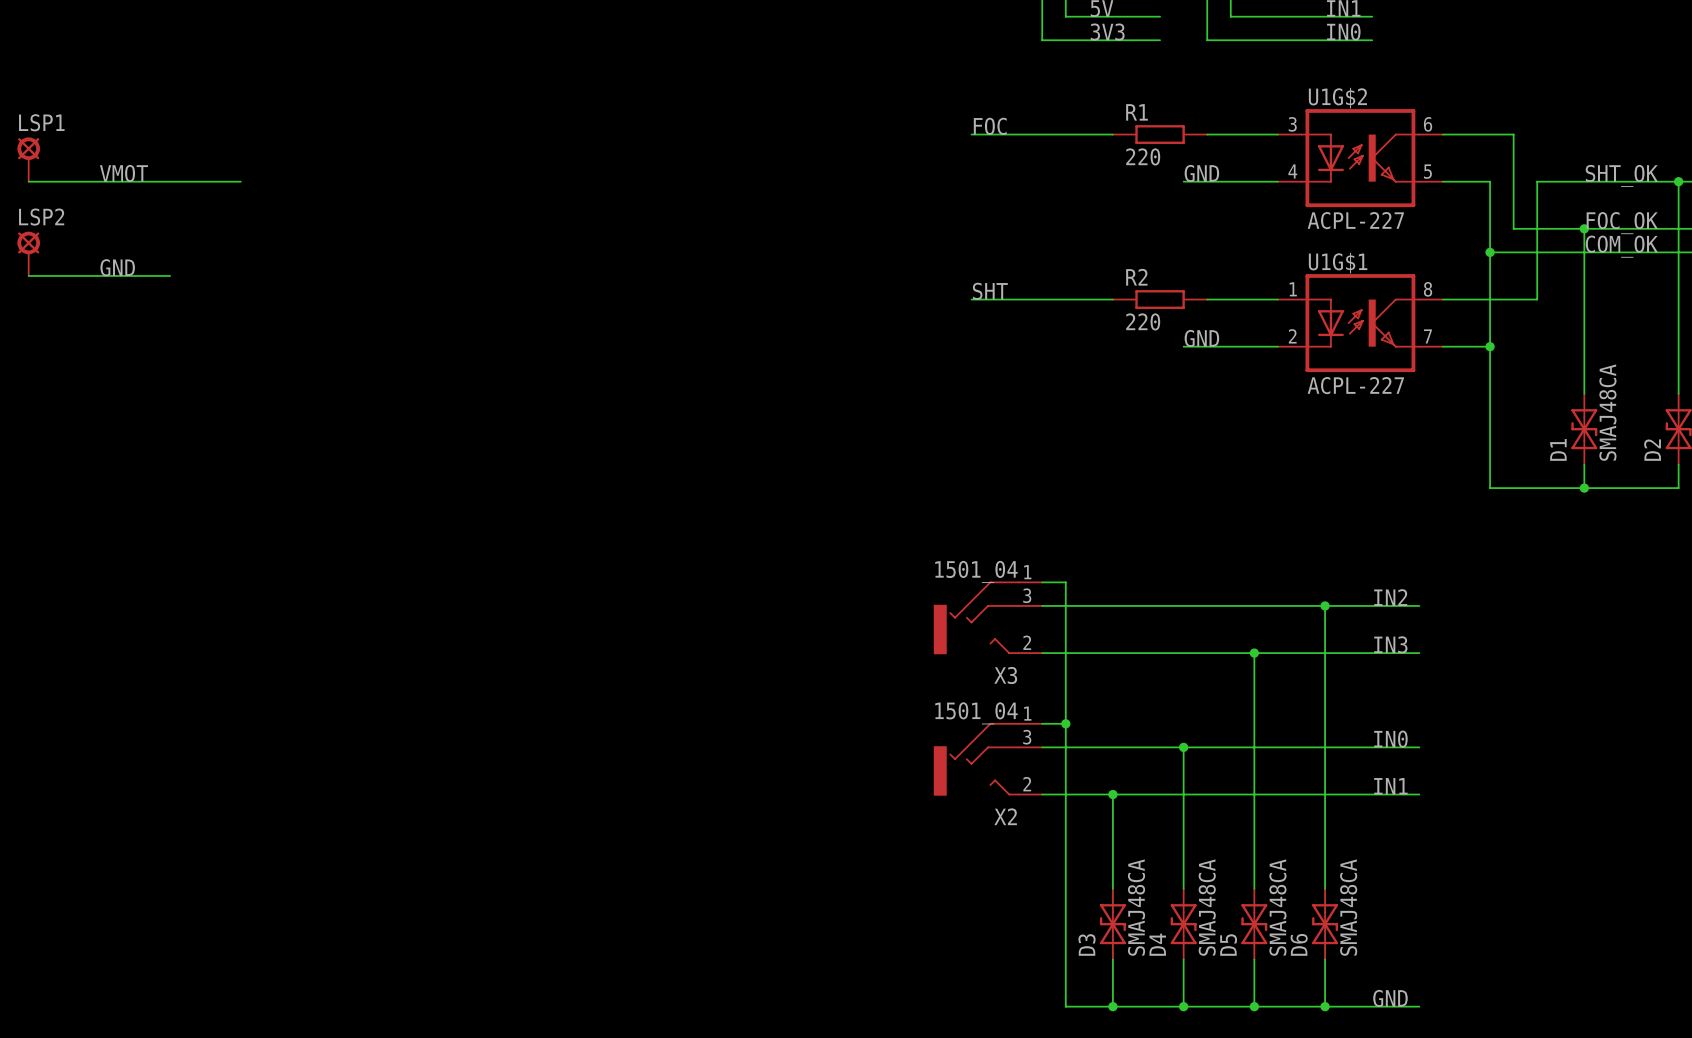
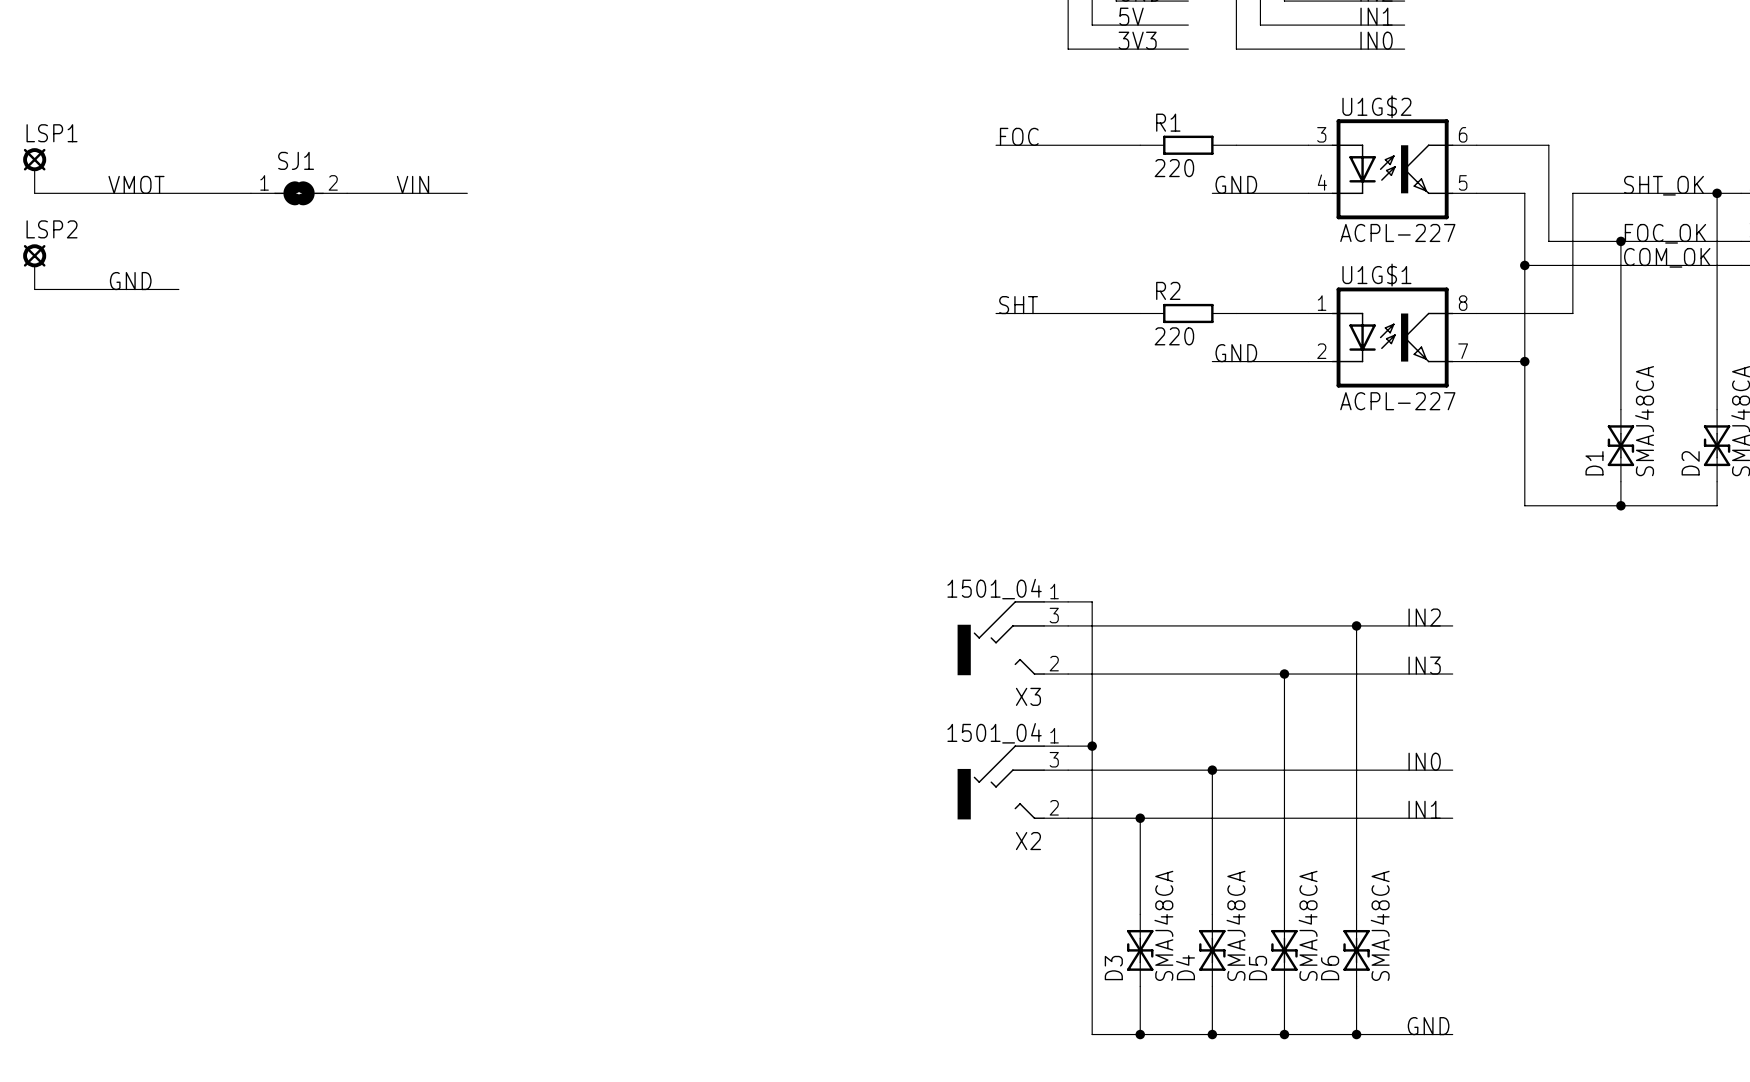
label: none -> VIN (413, 184)
SJ1: none -> (299, 193)
wire: none -> (347, 193) (467, 193)

